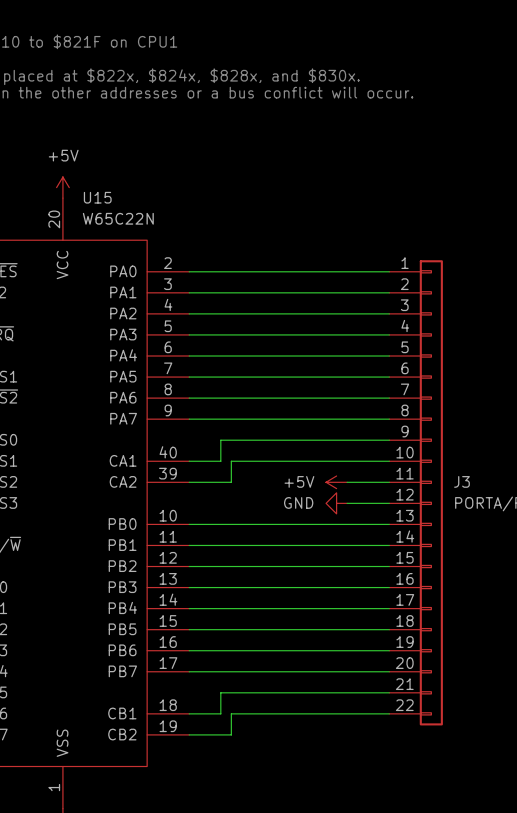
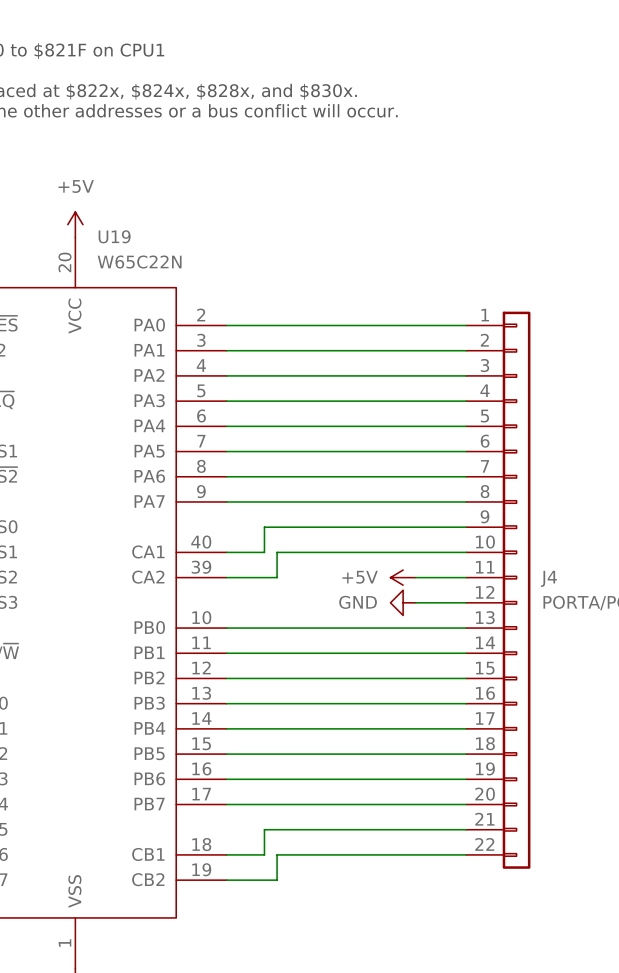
U15 name: U15 (97, 197) -> U19 (114, 236)
J3 name: J3 (461, 481) -> J4 (548, 578)

